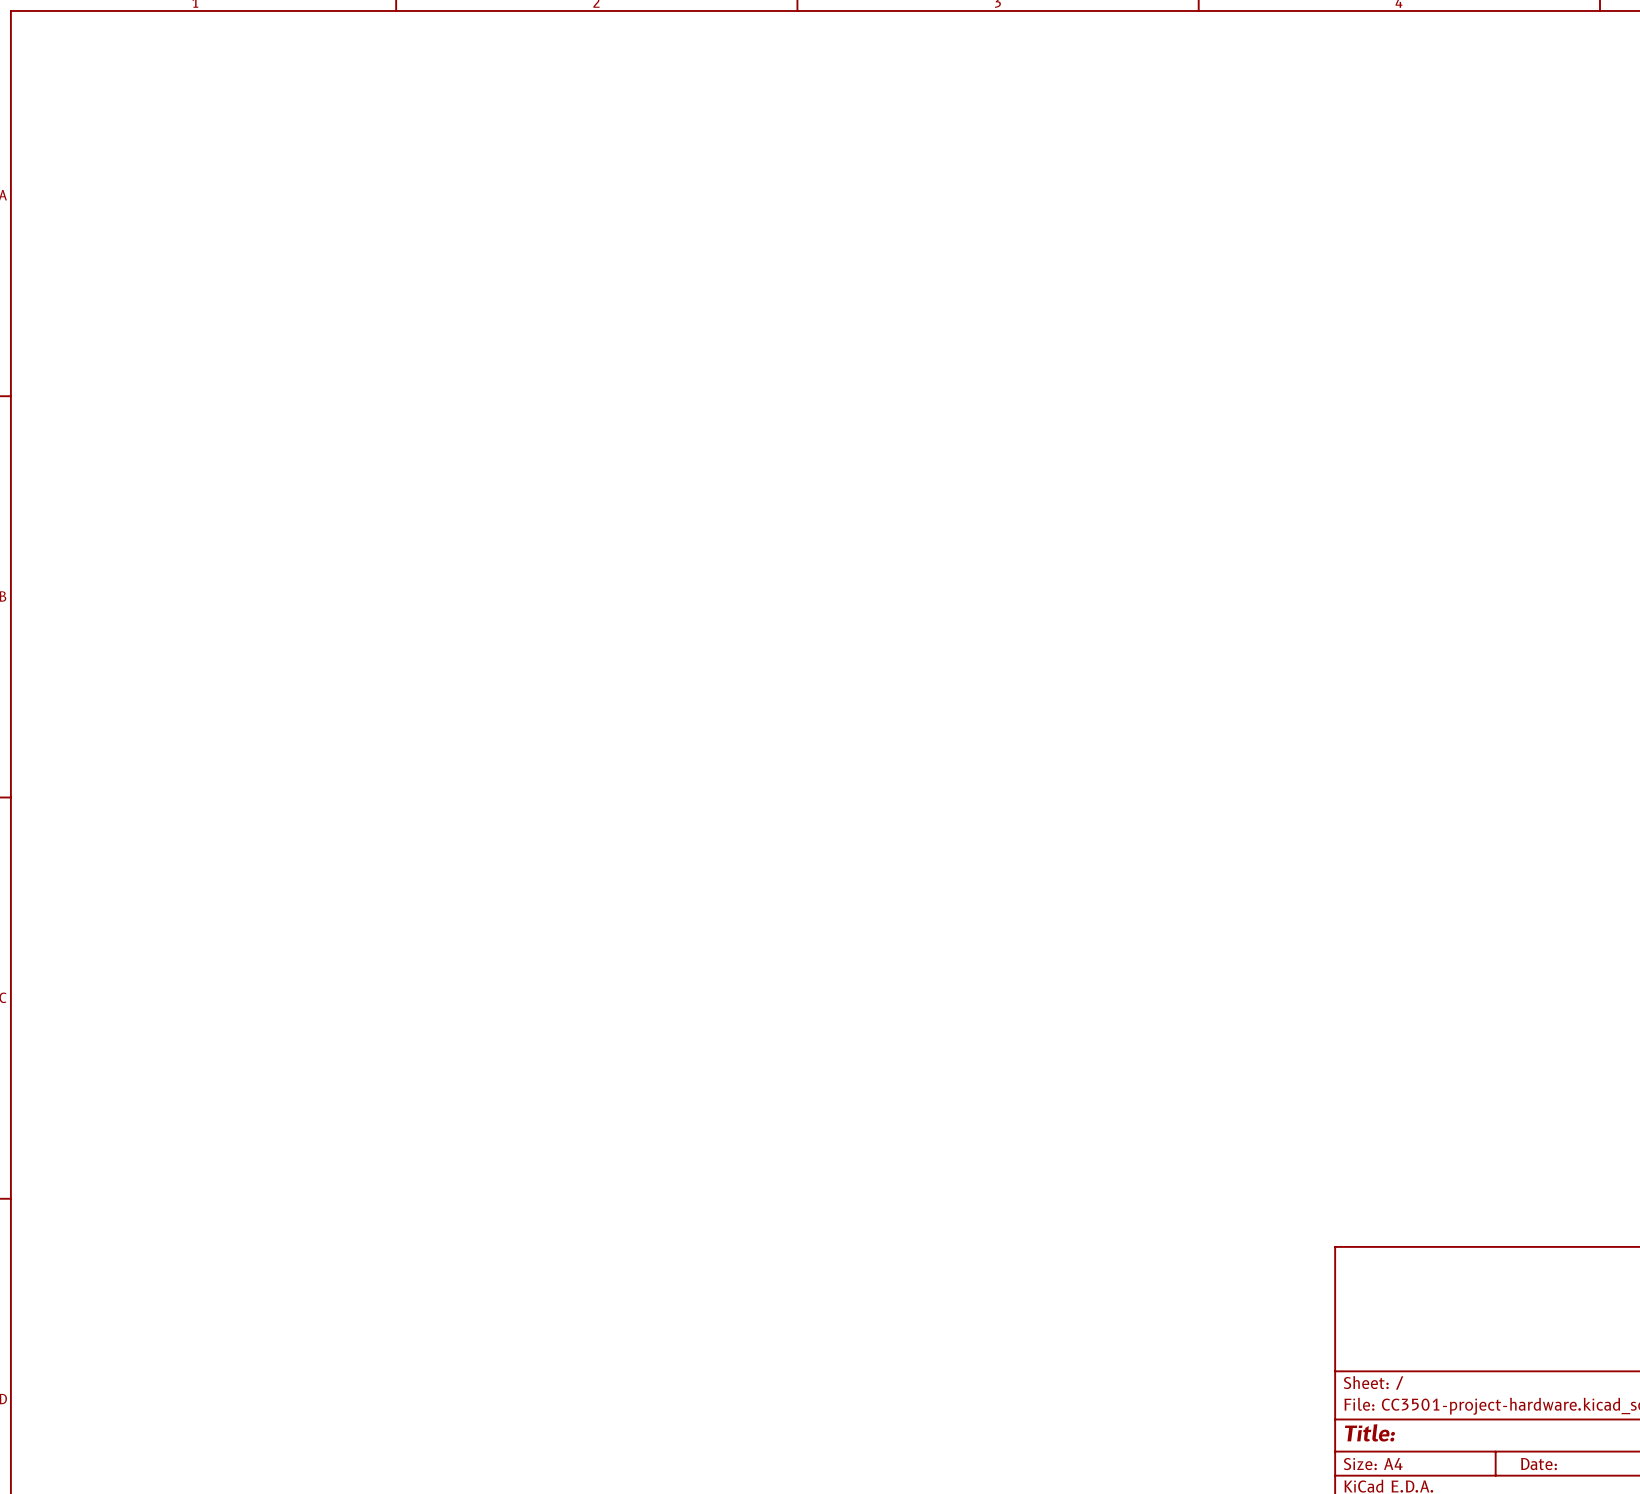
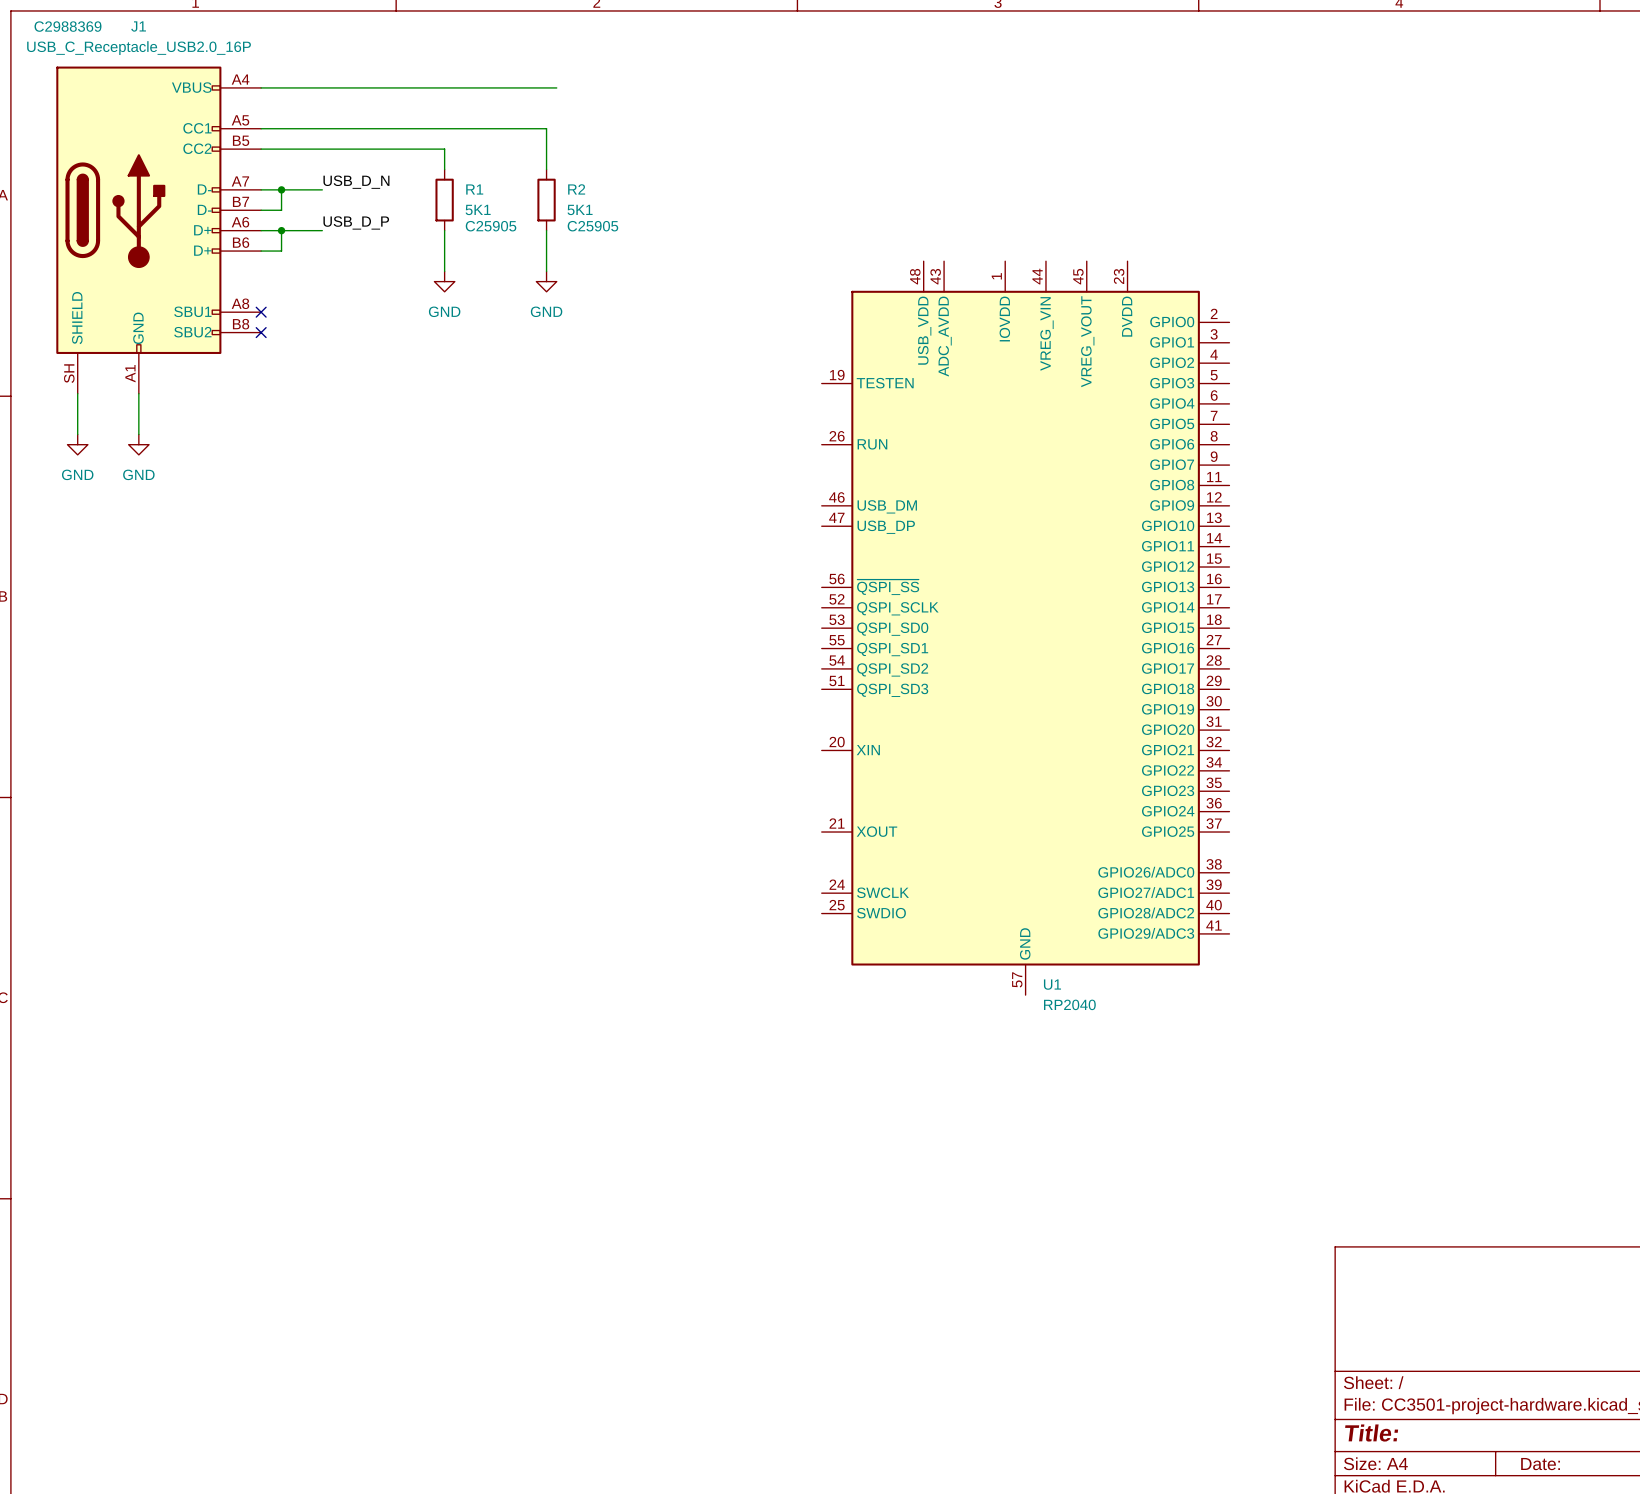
wire: none -> (261, 87) (556, 87)
wire: none -> (261, 128) (546, 128) (546, 169)
wire: none -> (261, 149) (444, 149) (444, 169)
label: none -> USB_D_N (356, 182)
wire: none -> (261, 189) (322, 189)
wire: none -> (281, 189) (281, 210) (261, 210)
junction: none -> (281, 189)
R1: none -> 5K1 (444, 200)
R2: none -> 5K1 (546, 200)
label: none -> USB_D_P (356, 222)
J1: none -> USB_C_Receptacle_USB2.0_16P (158, 230)
wire: none -> (261, 230) (322, 230)
wire: none -> (281, 230) (281, 251) (261, 251)
junction: none -> (281, 230)
wire: none -> (444, 230) (444, 271)
wire: none -> (546, 230) (546, 271)
power symbol: none -> GND (444, 281)
power symbol: none -> GND (546, 281)
no-connect mark: none -> (261, 312)
no-connect mark: none -> (261, 332)
wire: none -> (77, 393) (77, 434)
wire: none -> (138, 393) (138, 434)
power symbol: none -> GND (77, 444)
power symbol: none -> GND (138, 444)
U1: none -> RP2040 (1025, 628)

